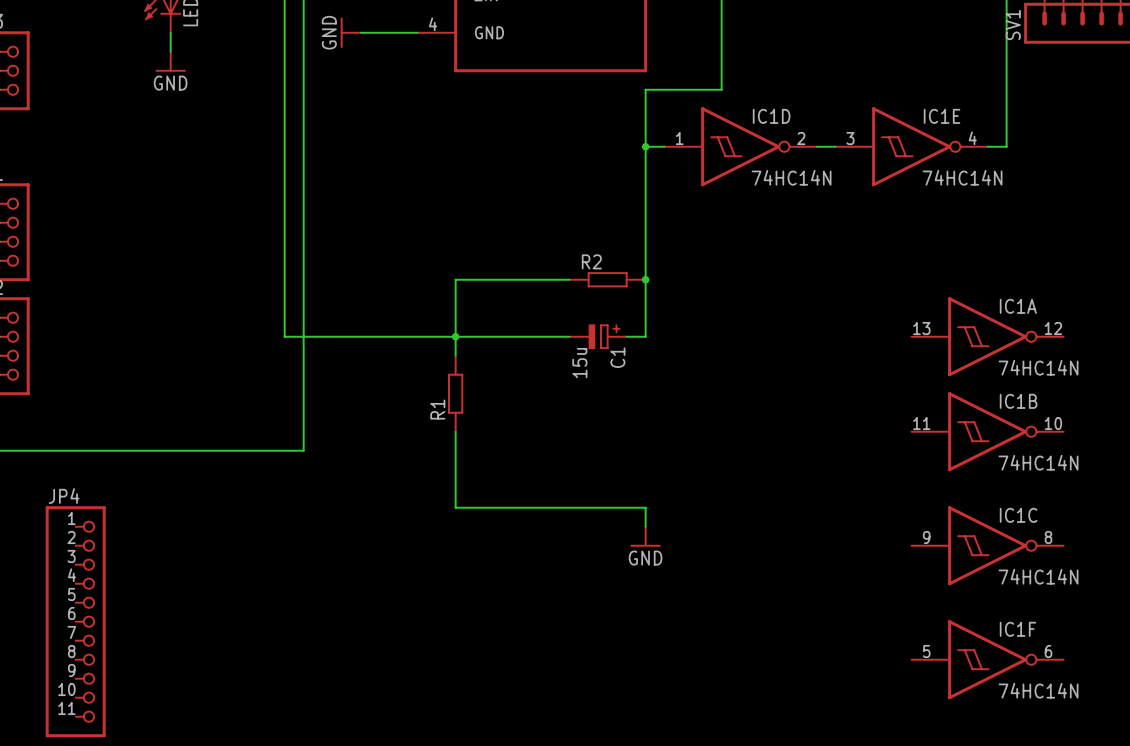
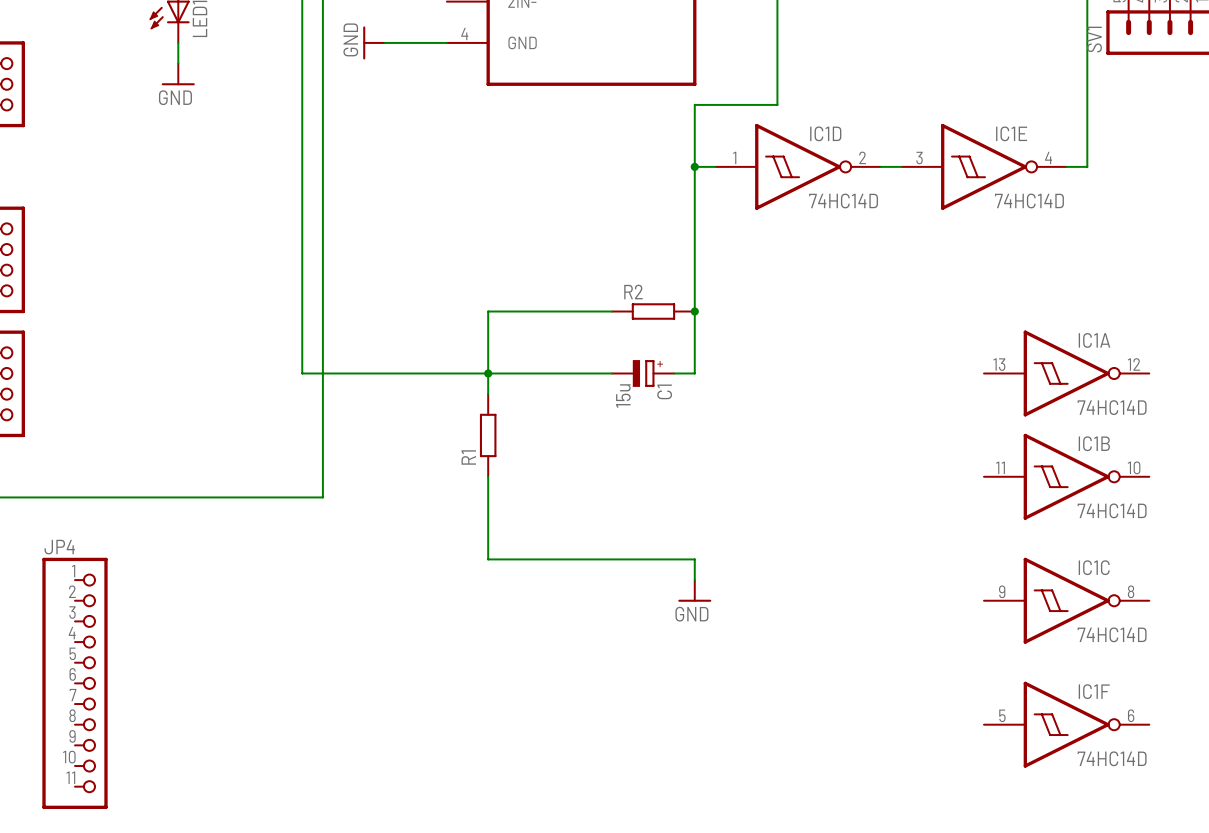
IC1D value: 74HC14N (791, 177) -> 74HC14D (843, 200)
IC1E value: 74HC14N (962, 177) -> 74HC14D (1029, 200)
IC1A value: 74HC14N (1038, 367) -> 74HC14D (1112, 407)
IC1B value: 74HC14N (1038, 462) -> 74HC14D (1112, 510)
IC1C value: 74HC14N (1038, 576) -> 74HC14D (1112, 634)
IC1F value: 74HC14N (1038, 690) -> 74HC14D (1112, 758)

